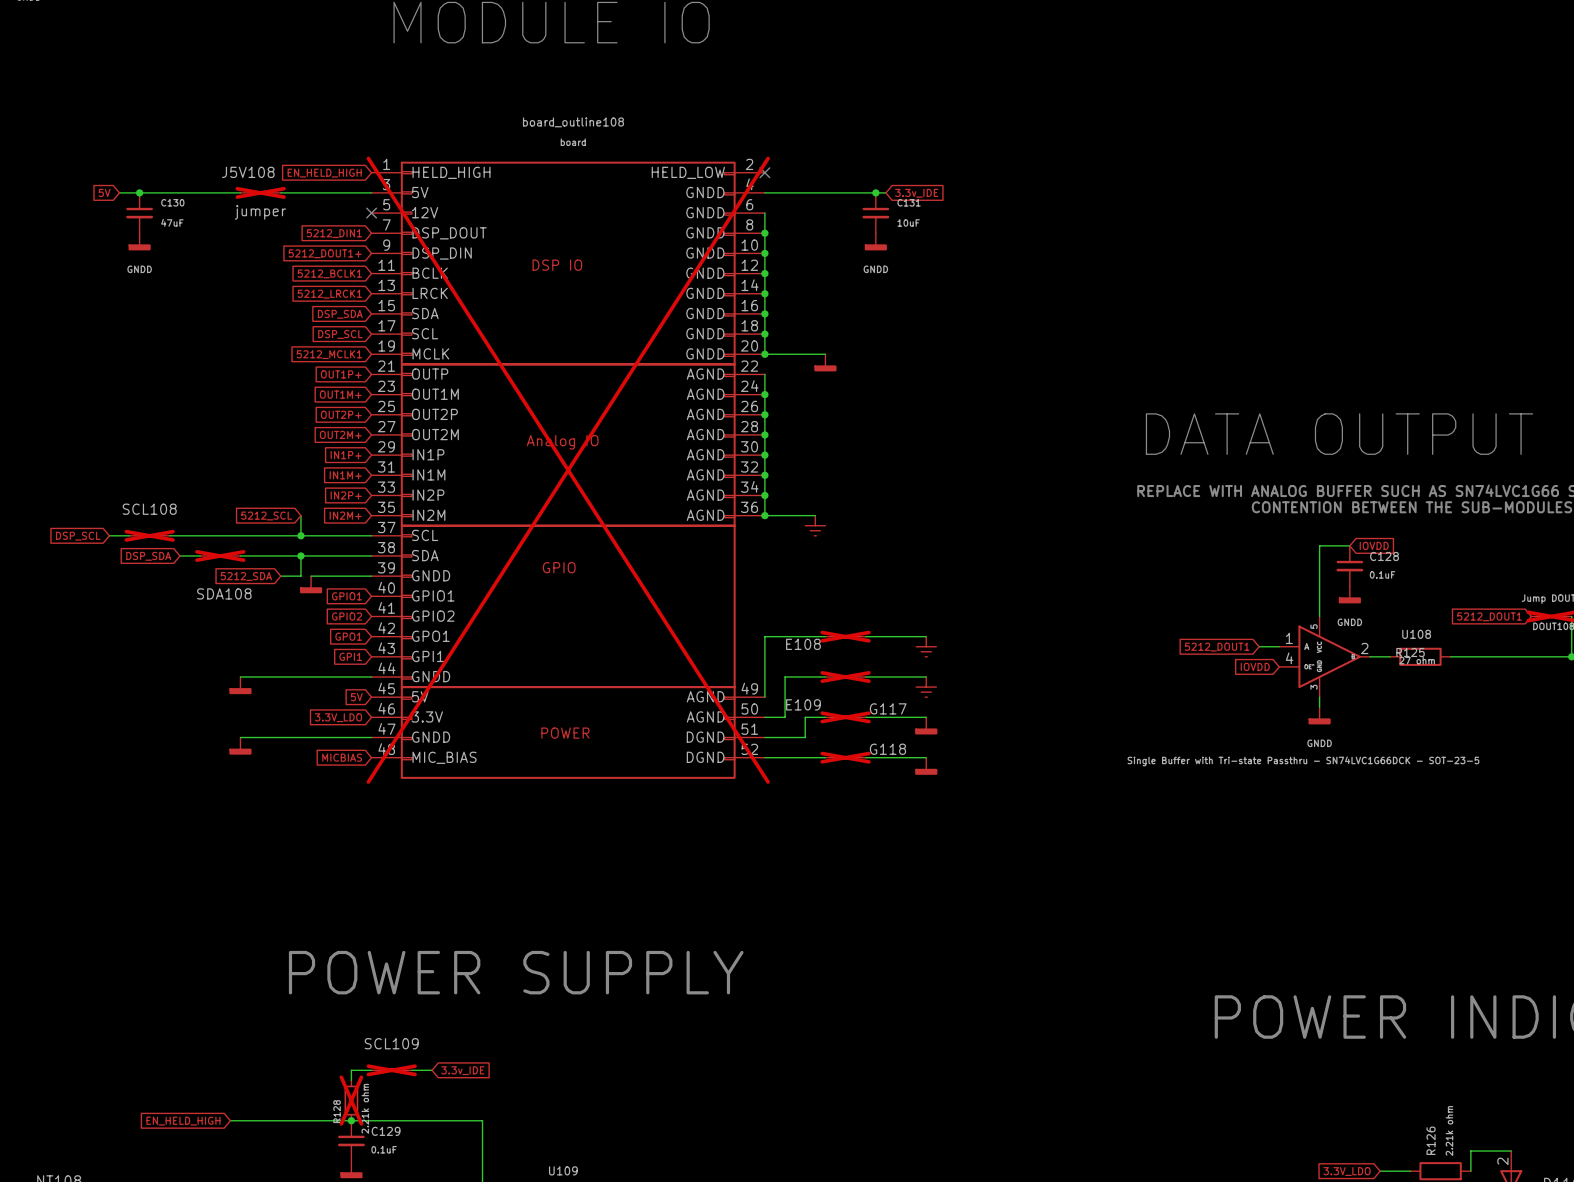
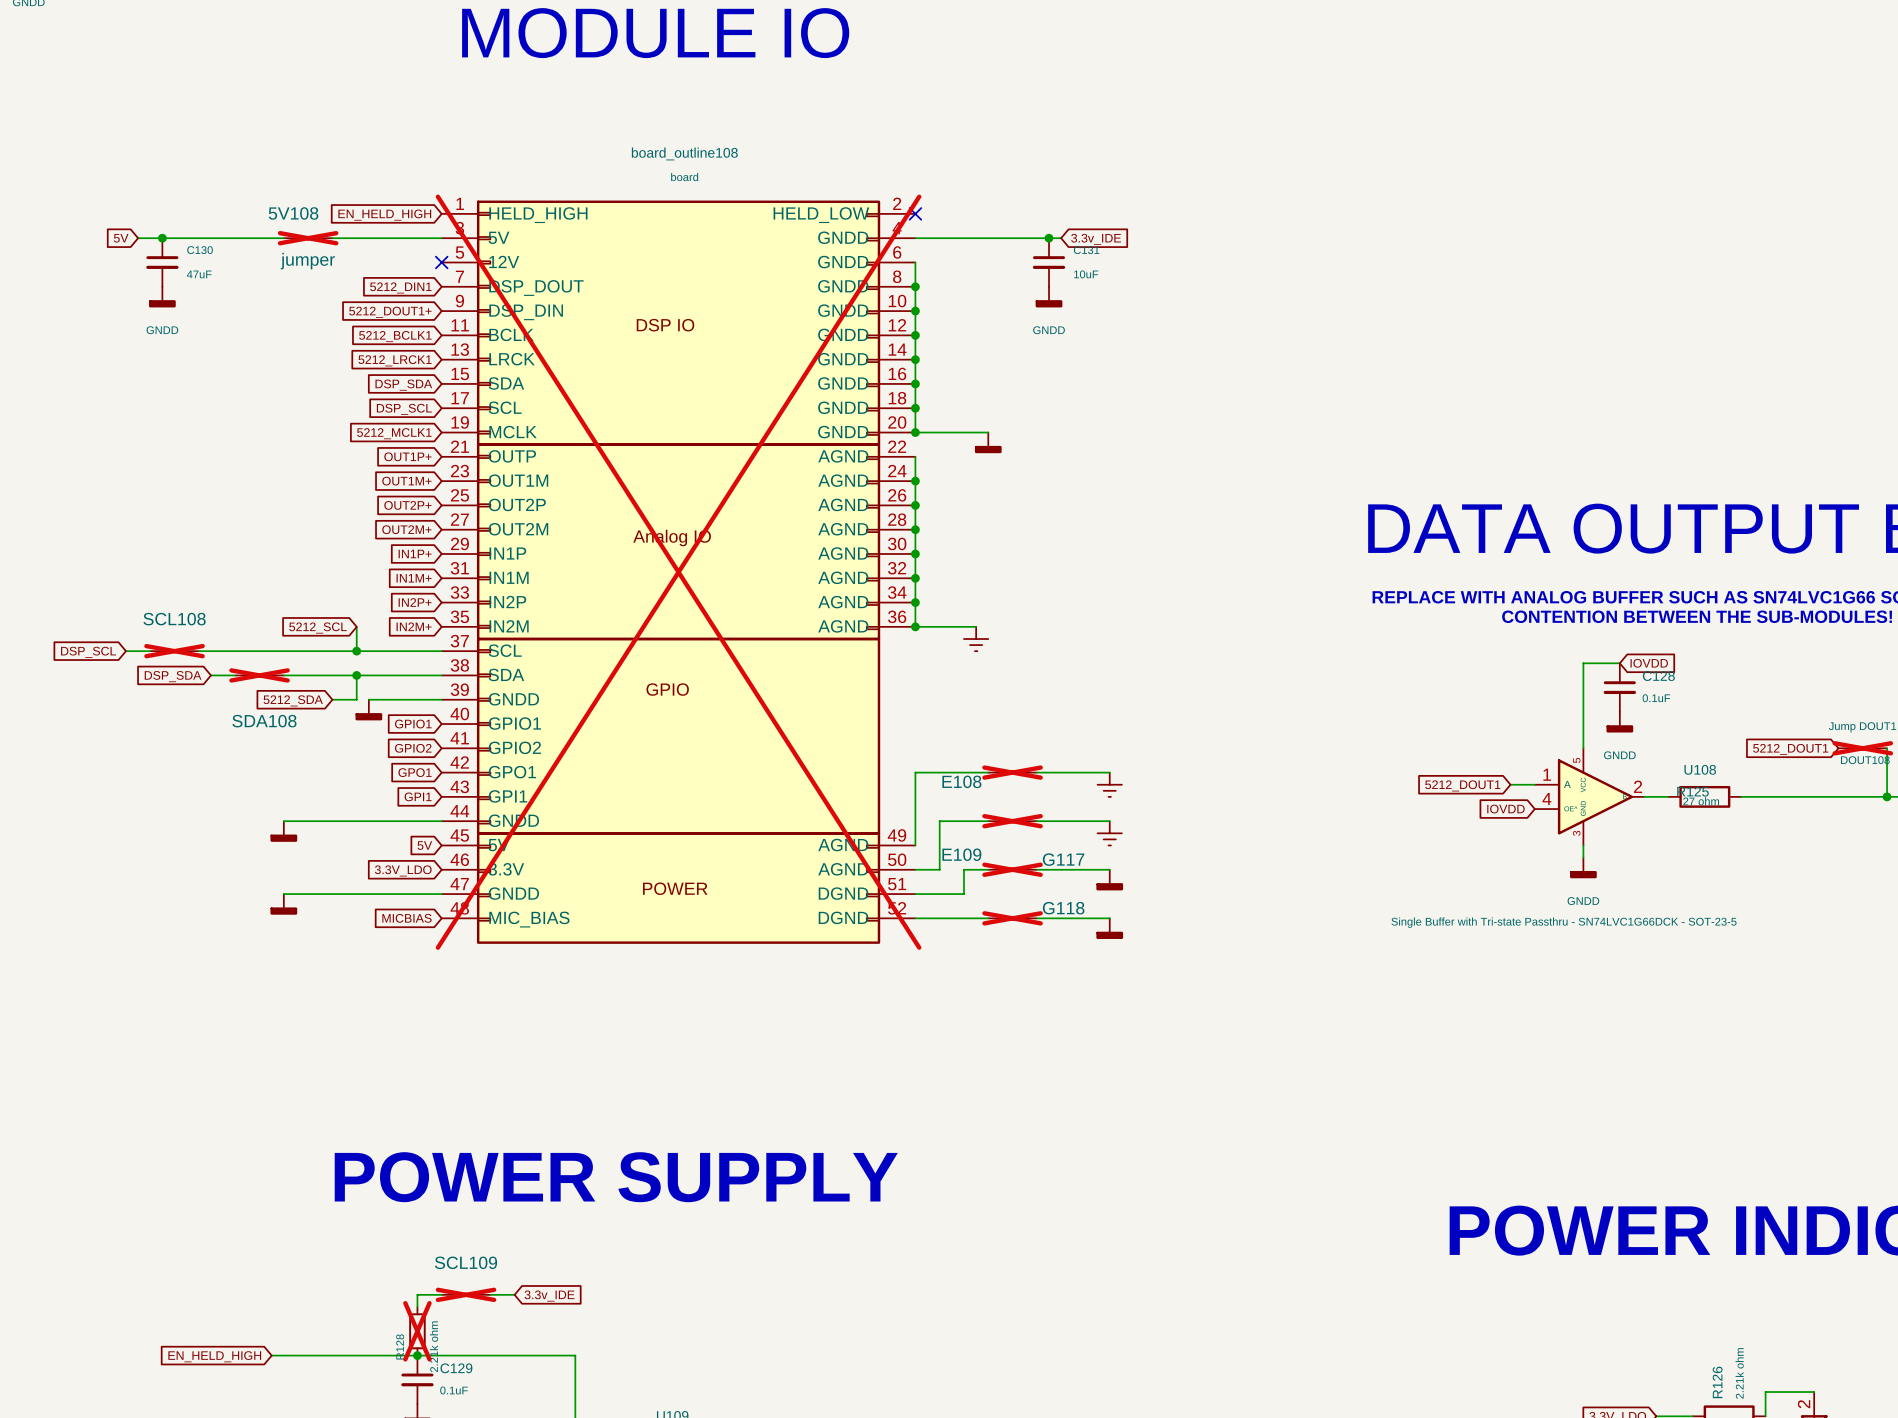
J5V108 name: J5V108 (248, 172) -> 5V108 (293, 213)

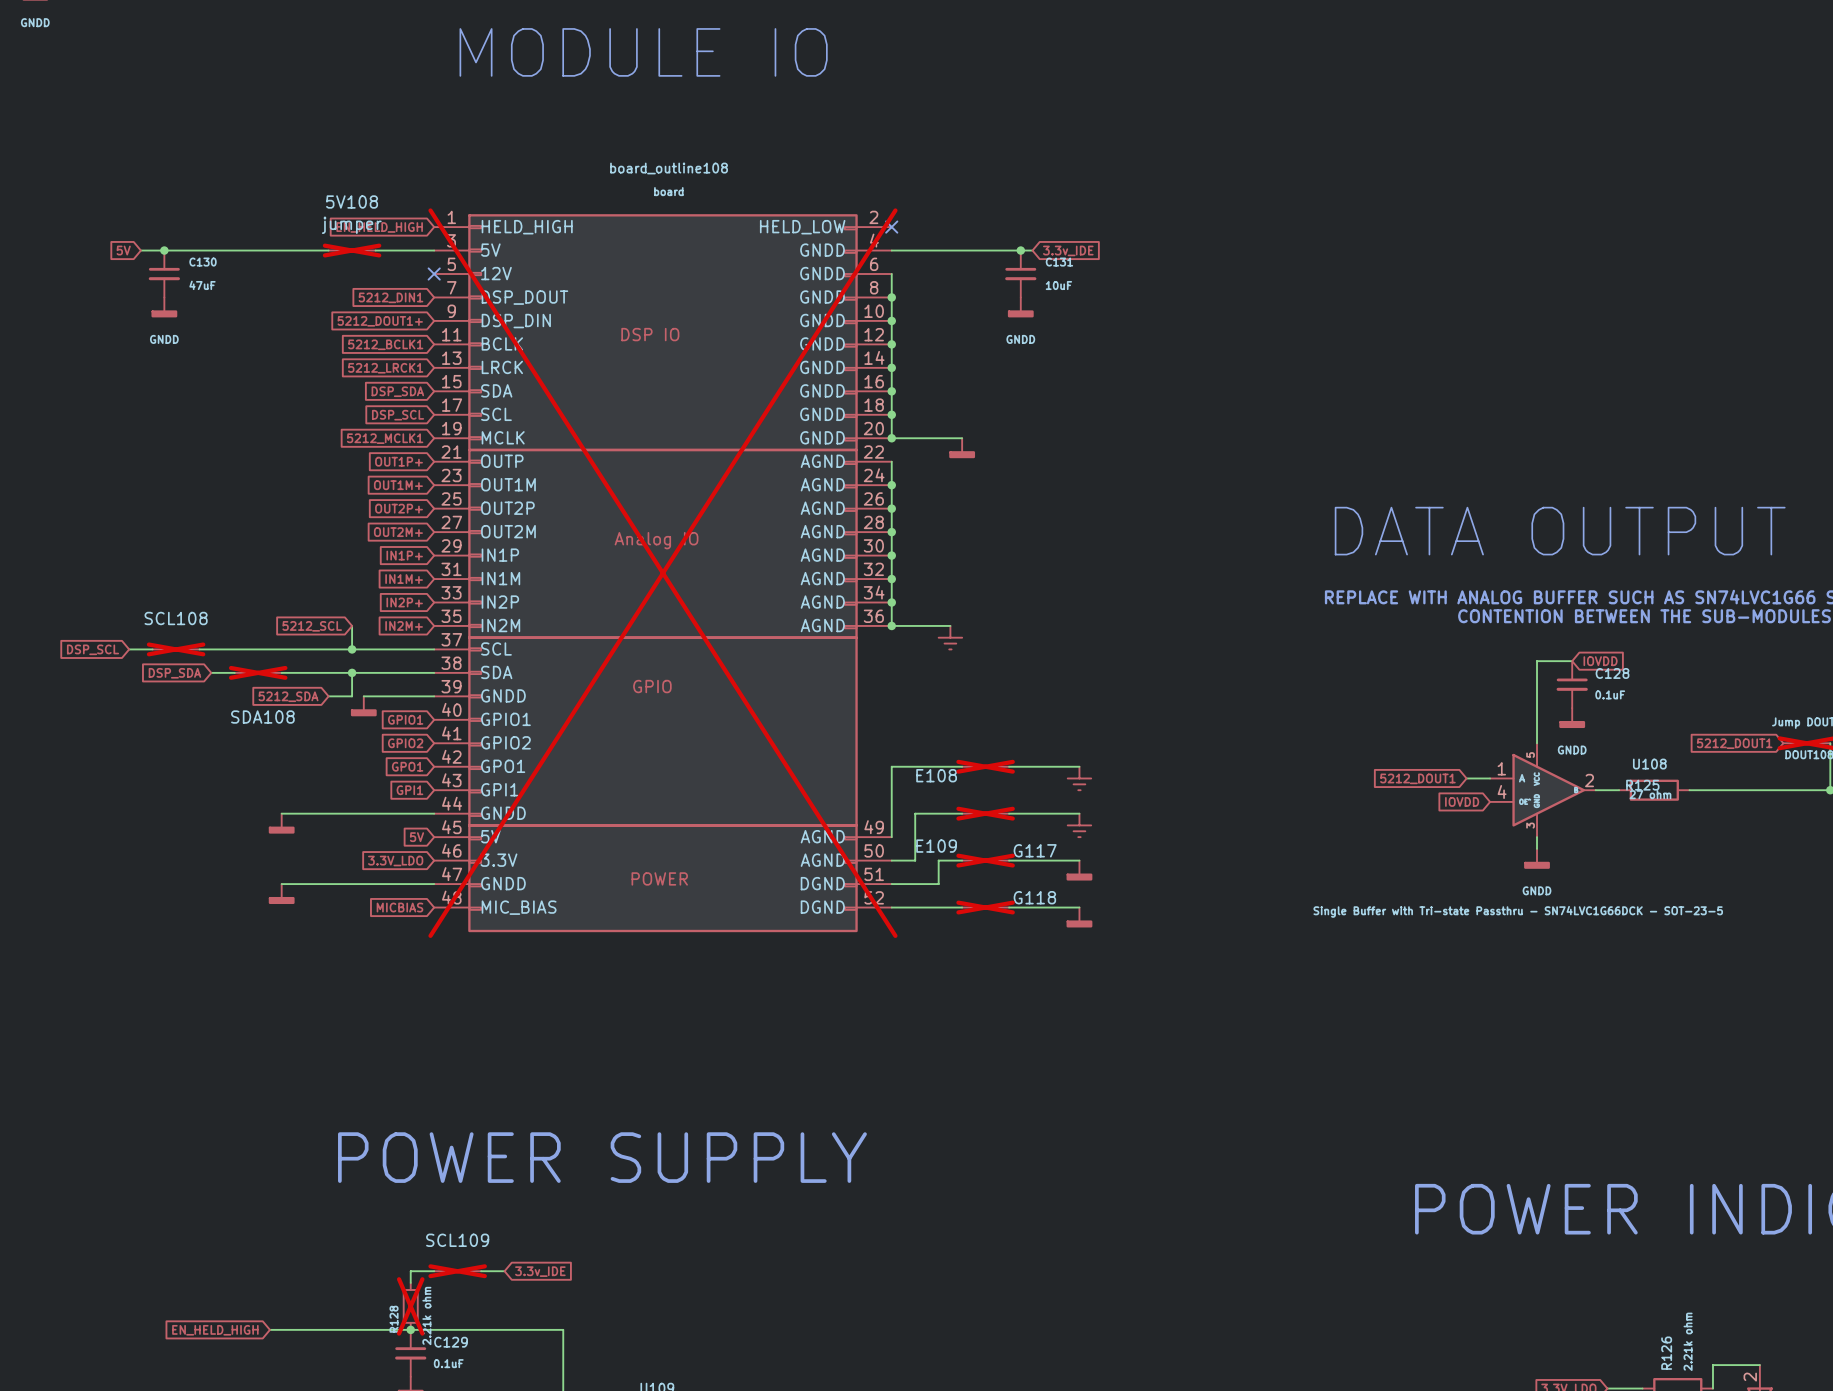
5V108 name position: 5V108 (293, 213) -> 5V108 (352, 202)
5V108 position: (308, 238) -> (352, 250)
5V108 value position: jumper (307, 261) -> jumper (351, 225)

